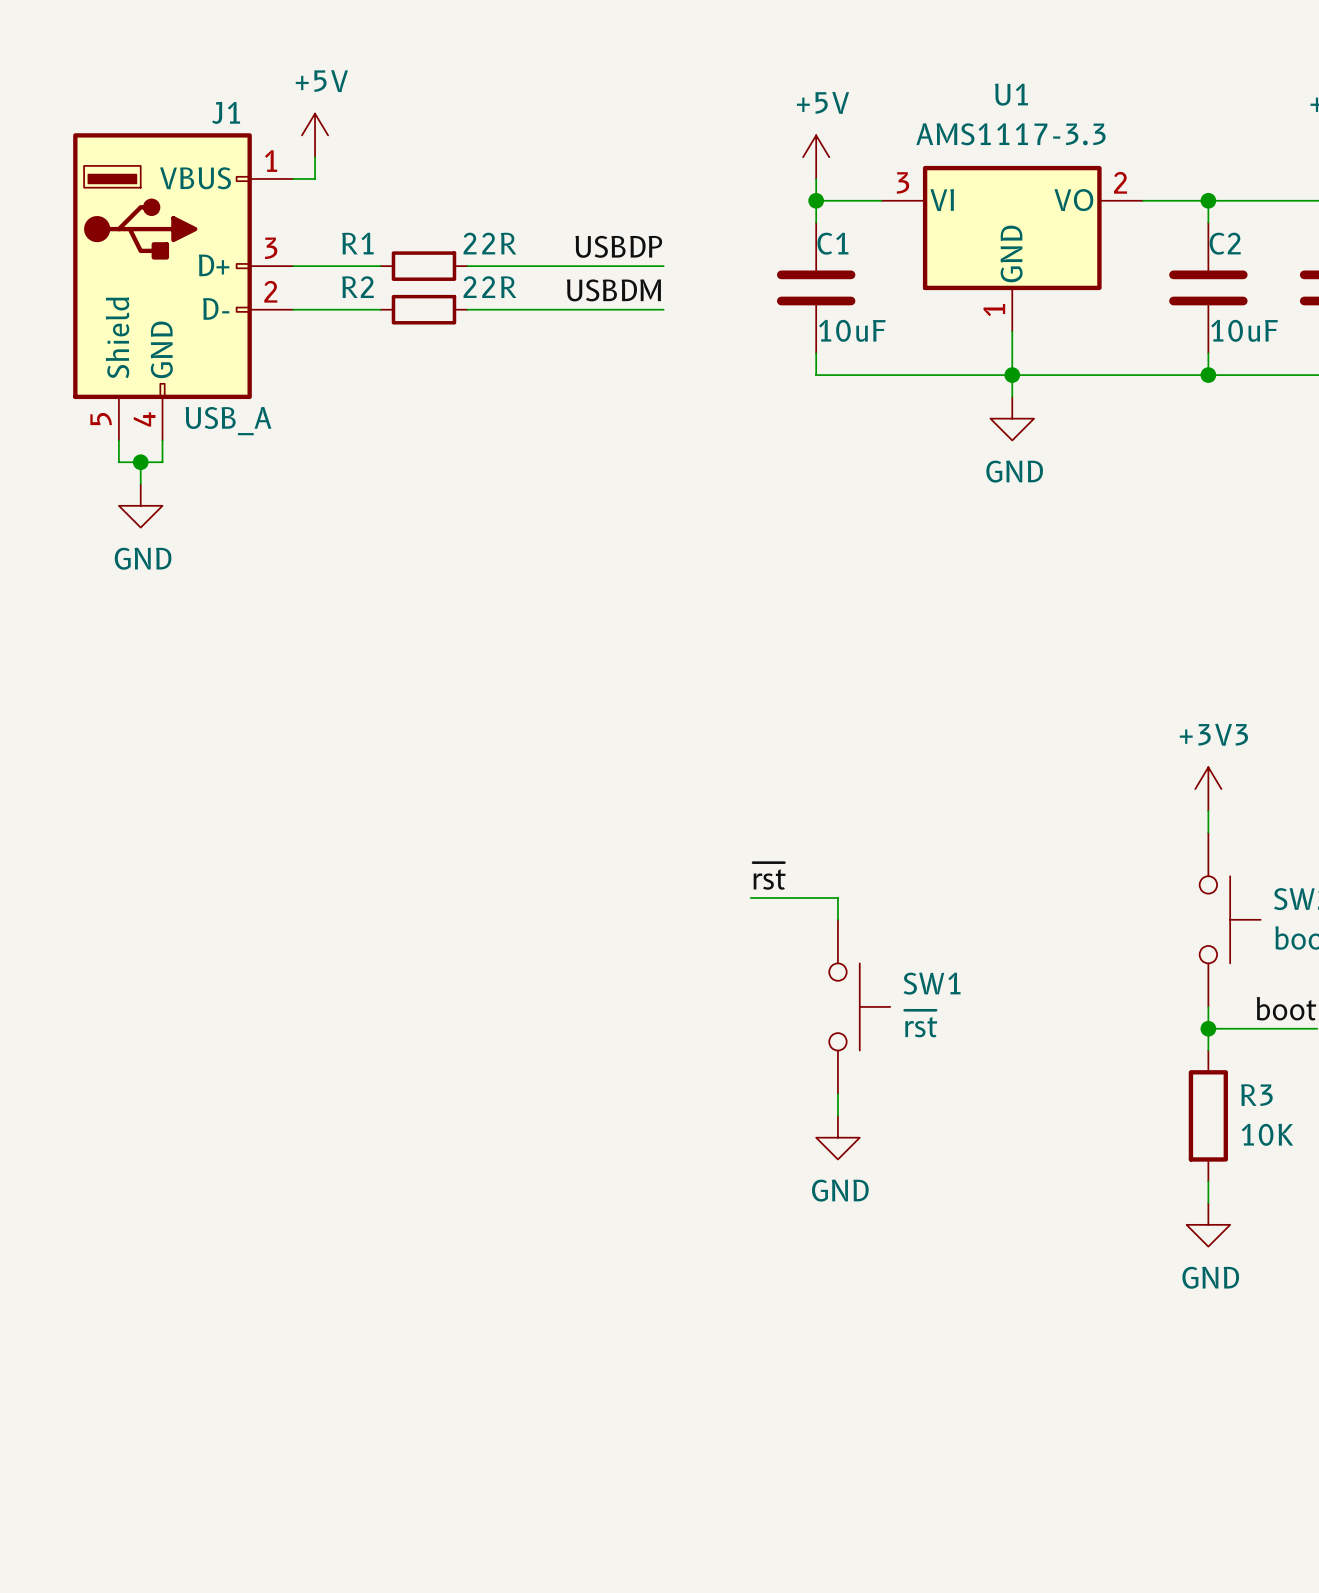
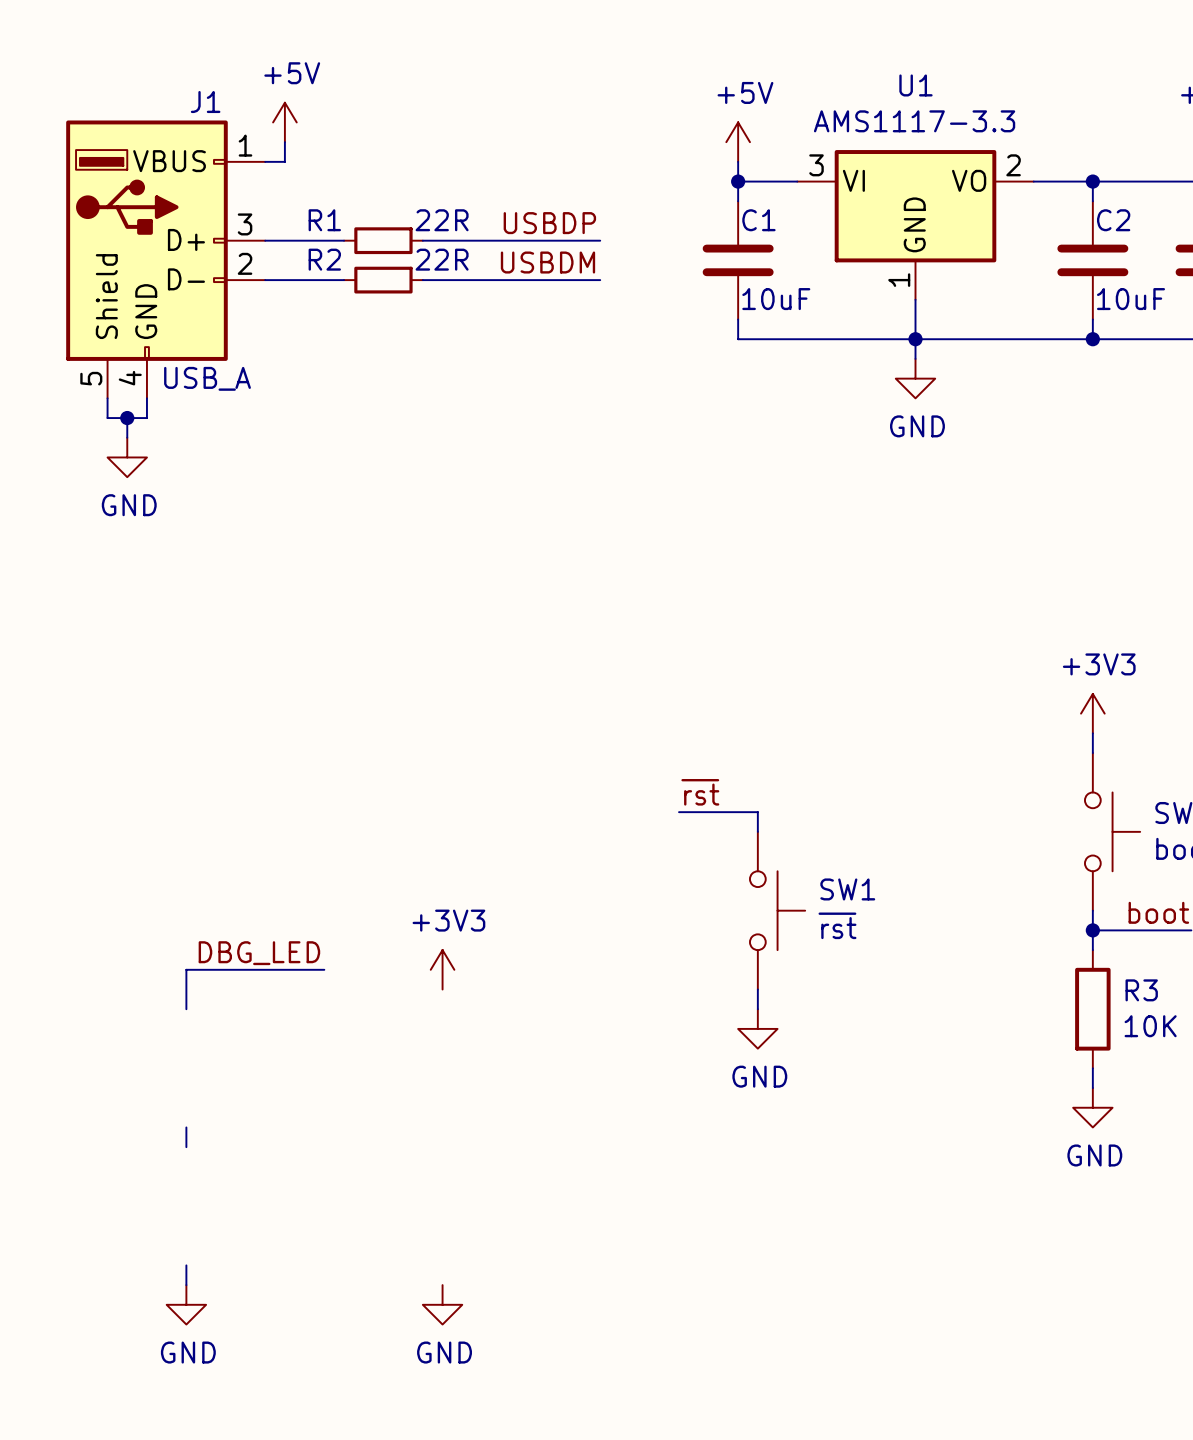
label: none -> DBG_LED (259, 953)
wire: none -> (324, 969) (186, 969) (186, 1009)
power symbol: none -> +3V3 (442, 969)
wire: none -> (186, 1127) (186, 1147)
wire: none -> (186, 1265) (186, 1285)
power symbol: none -> GND (186, 1304)
power symbol: none -> GND (442, 1304)

